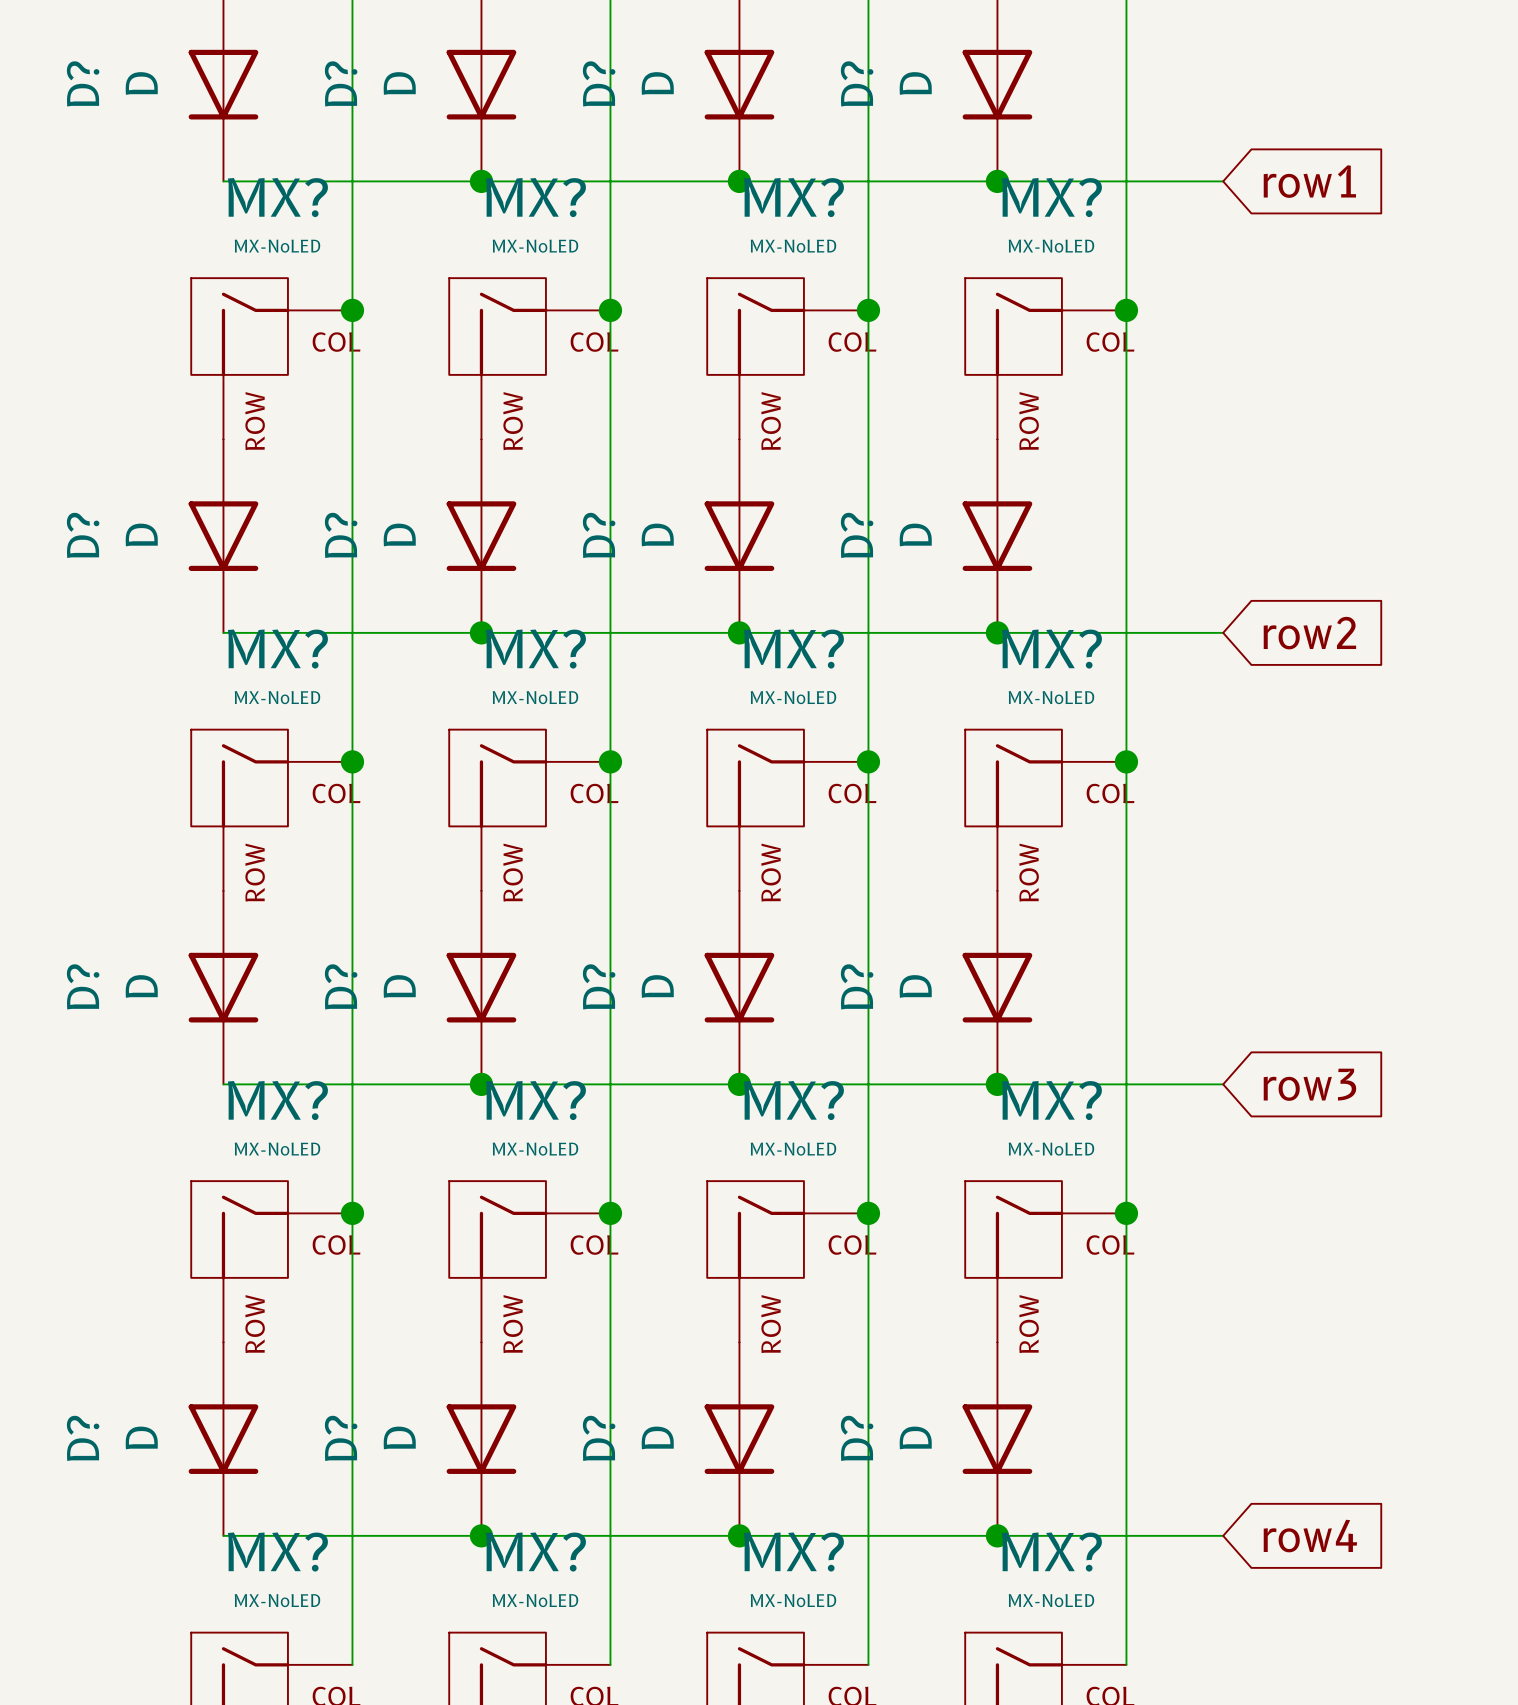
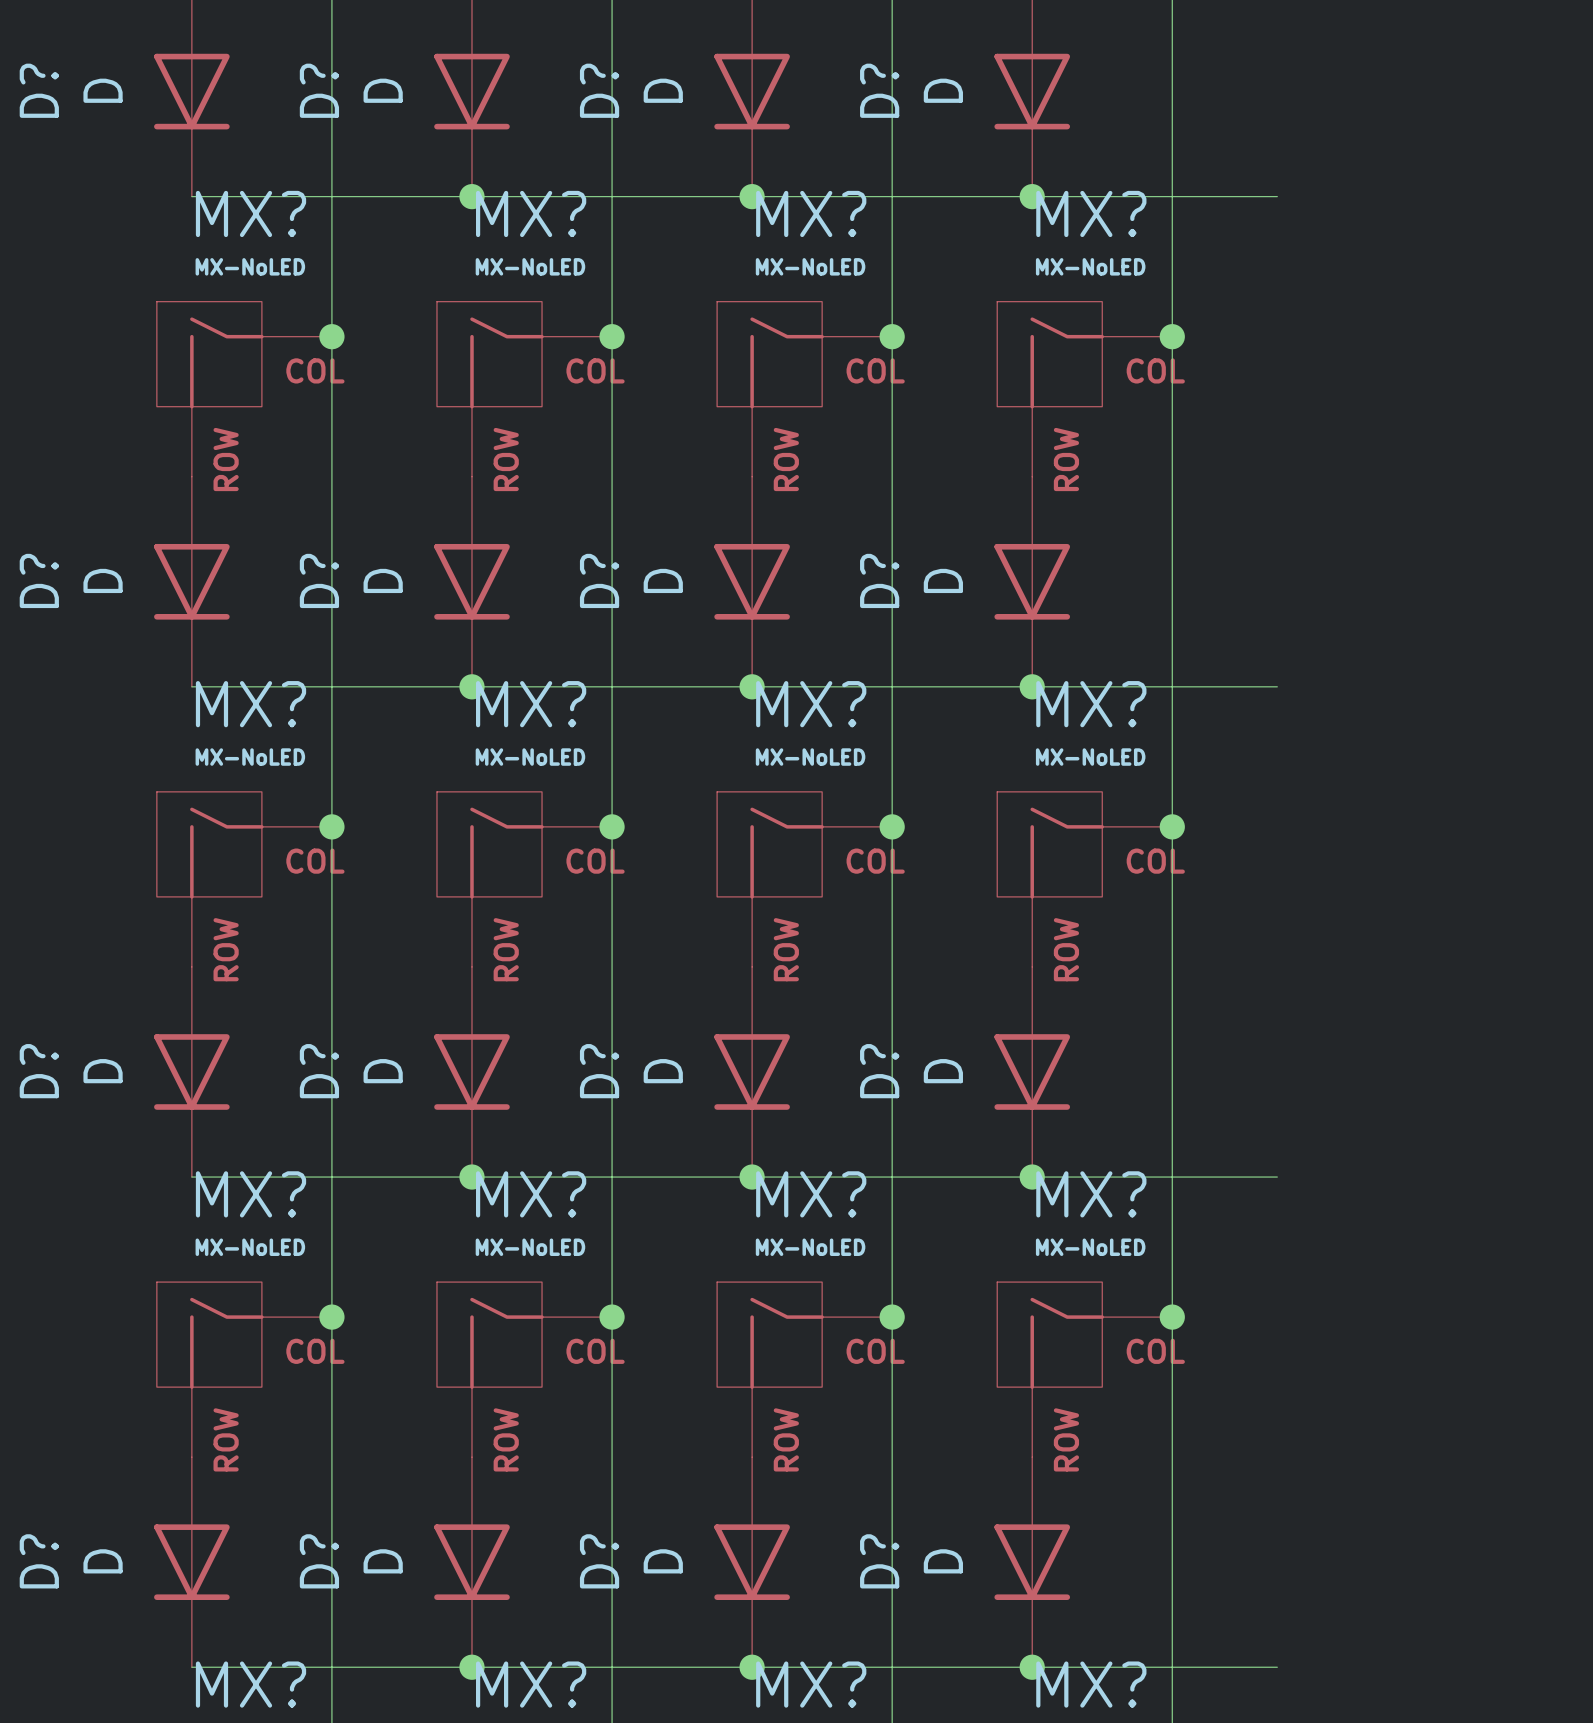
global label: row1 (1309, 181) -> none
global label: row2 (1309, 633) -> none
global label: row3 (1309, 1084) -> none
global label: row4 (1310, 1536) -> none

